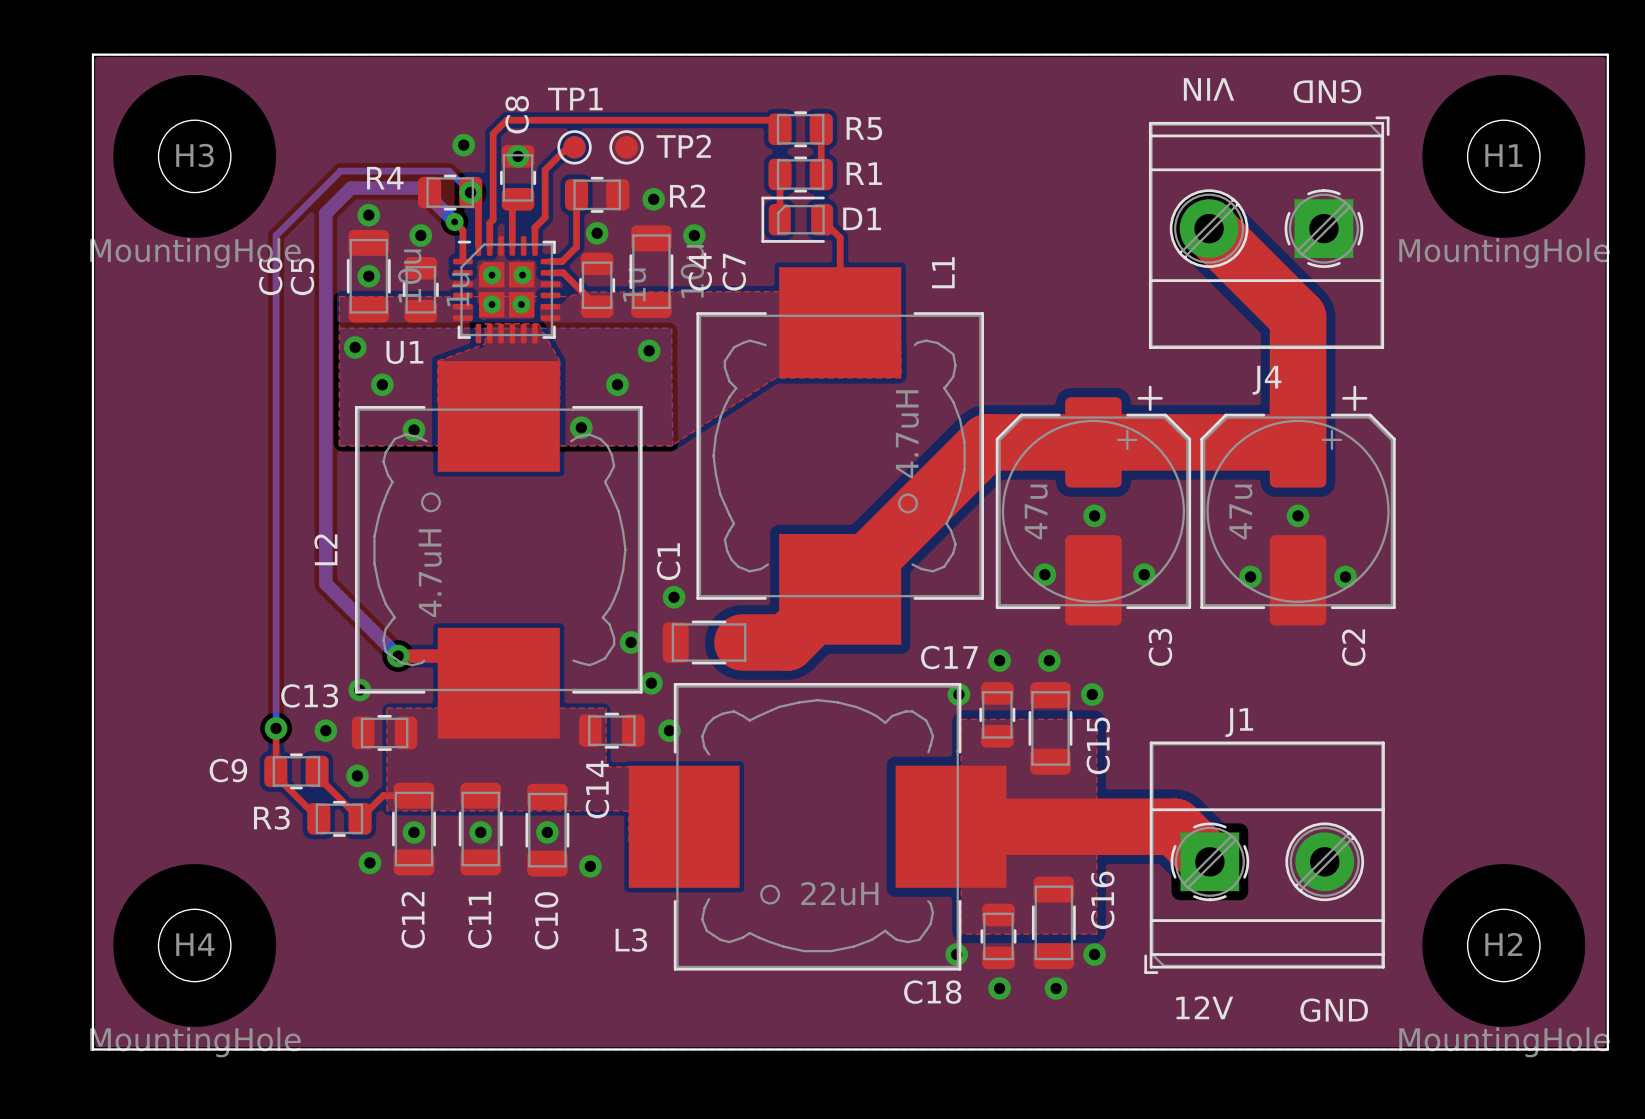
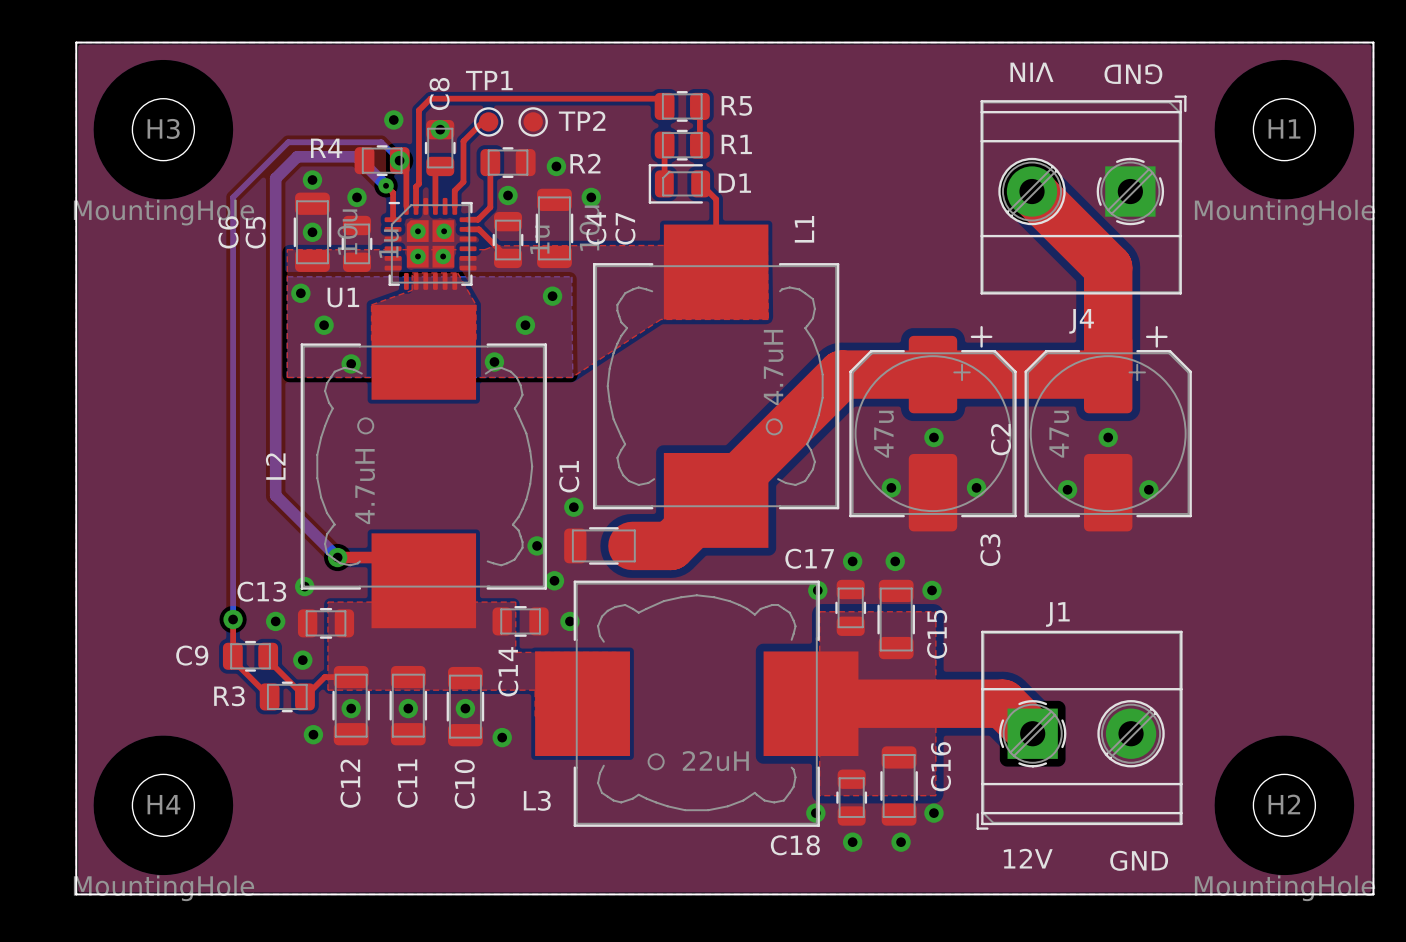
C2 name position: C2 (1353, 647) -> C2 (1001, 439)

